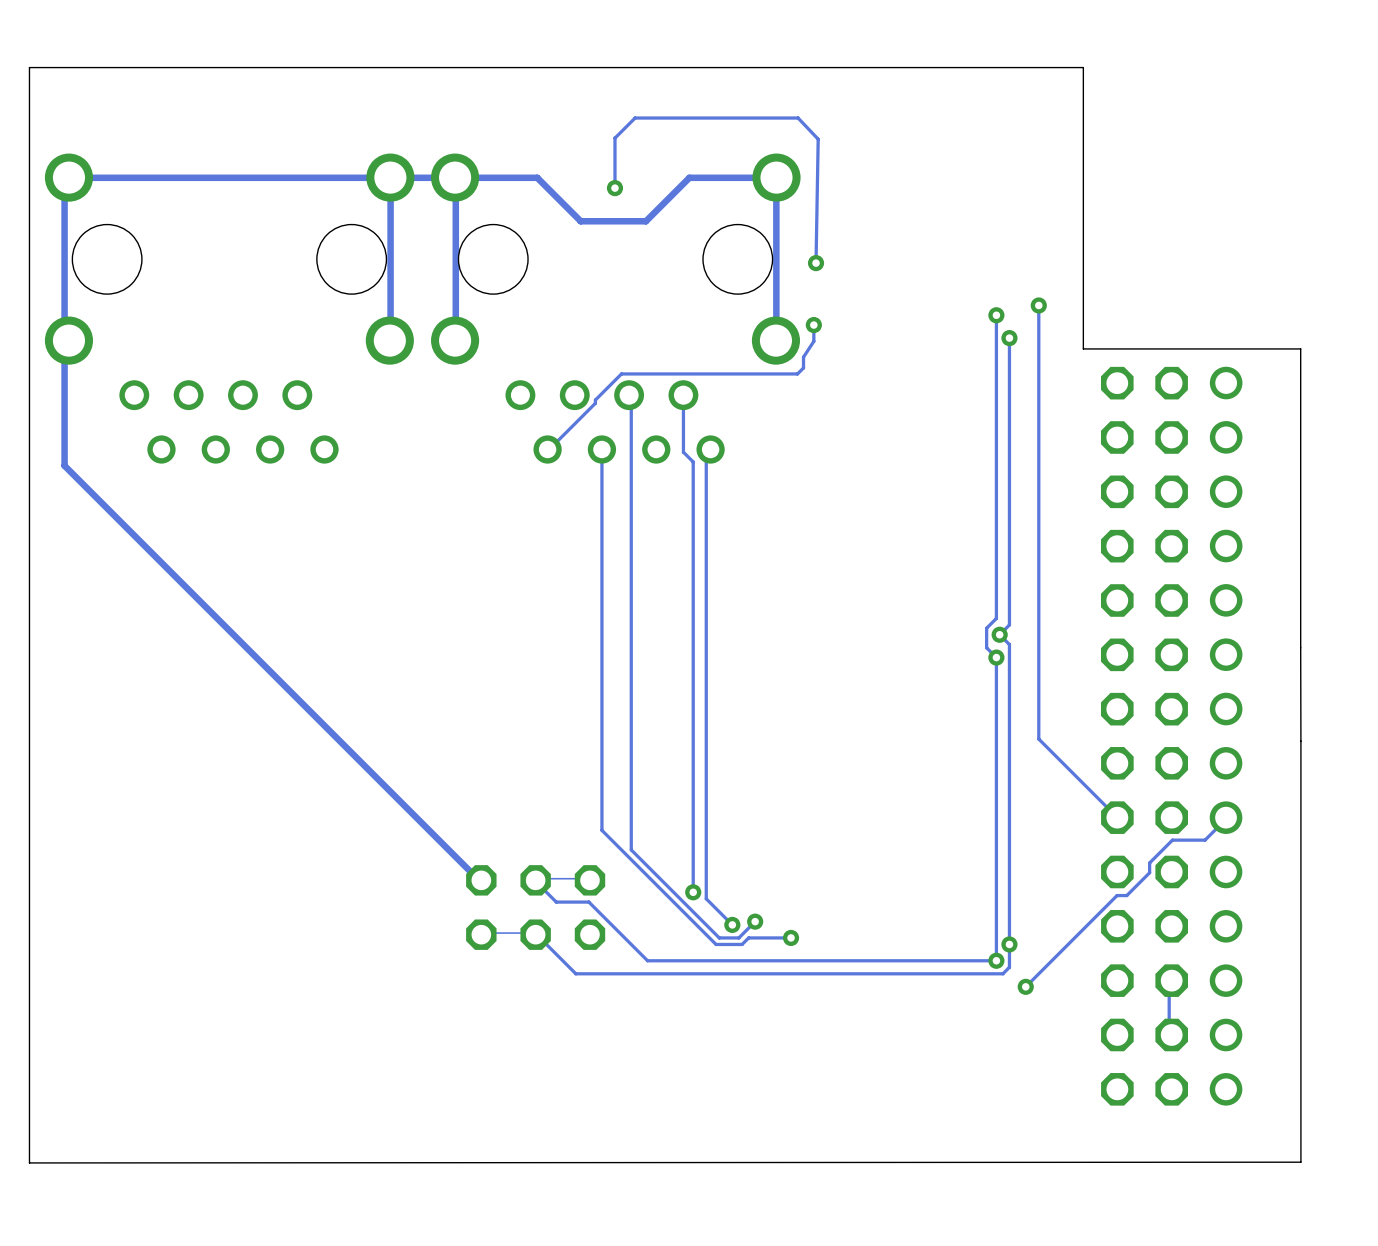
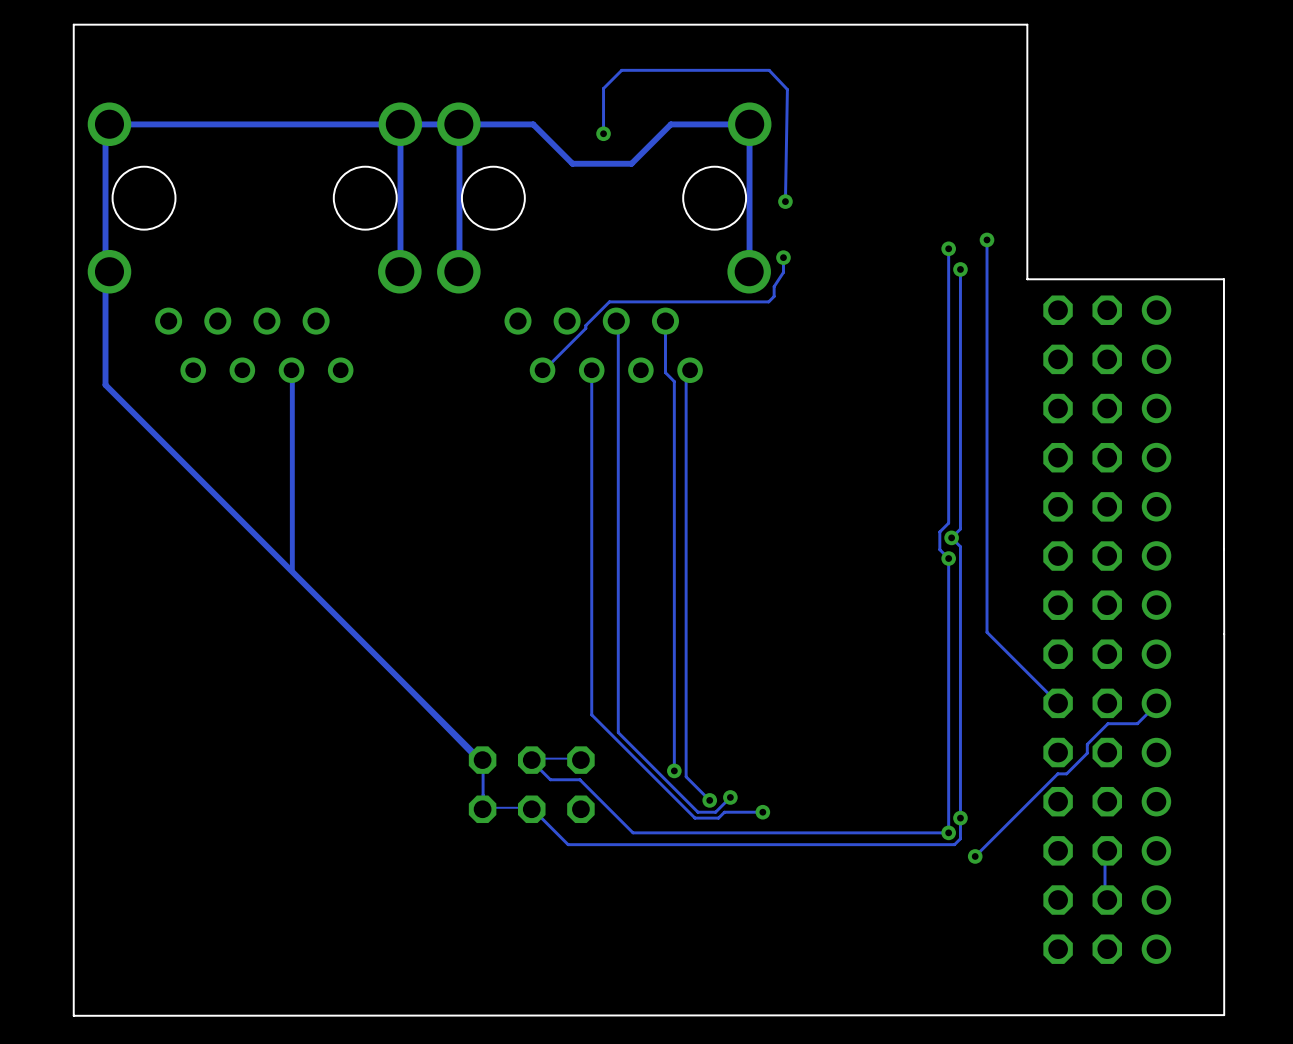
track: none -> (291, 370) (292, 570) (483, 766) (482, 809)

